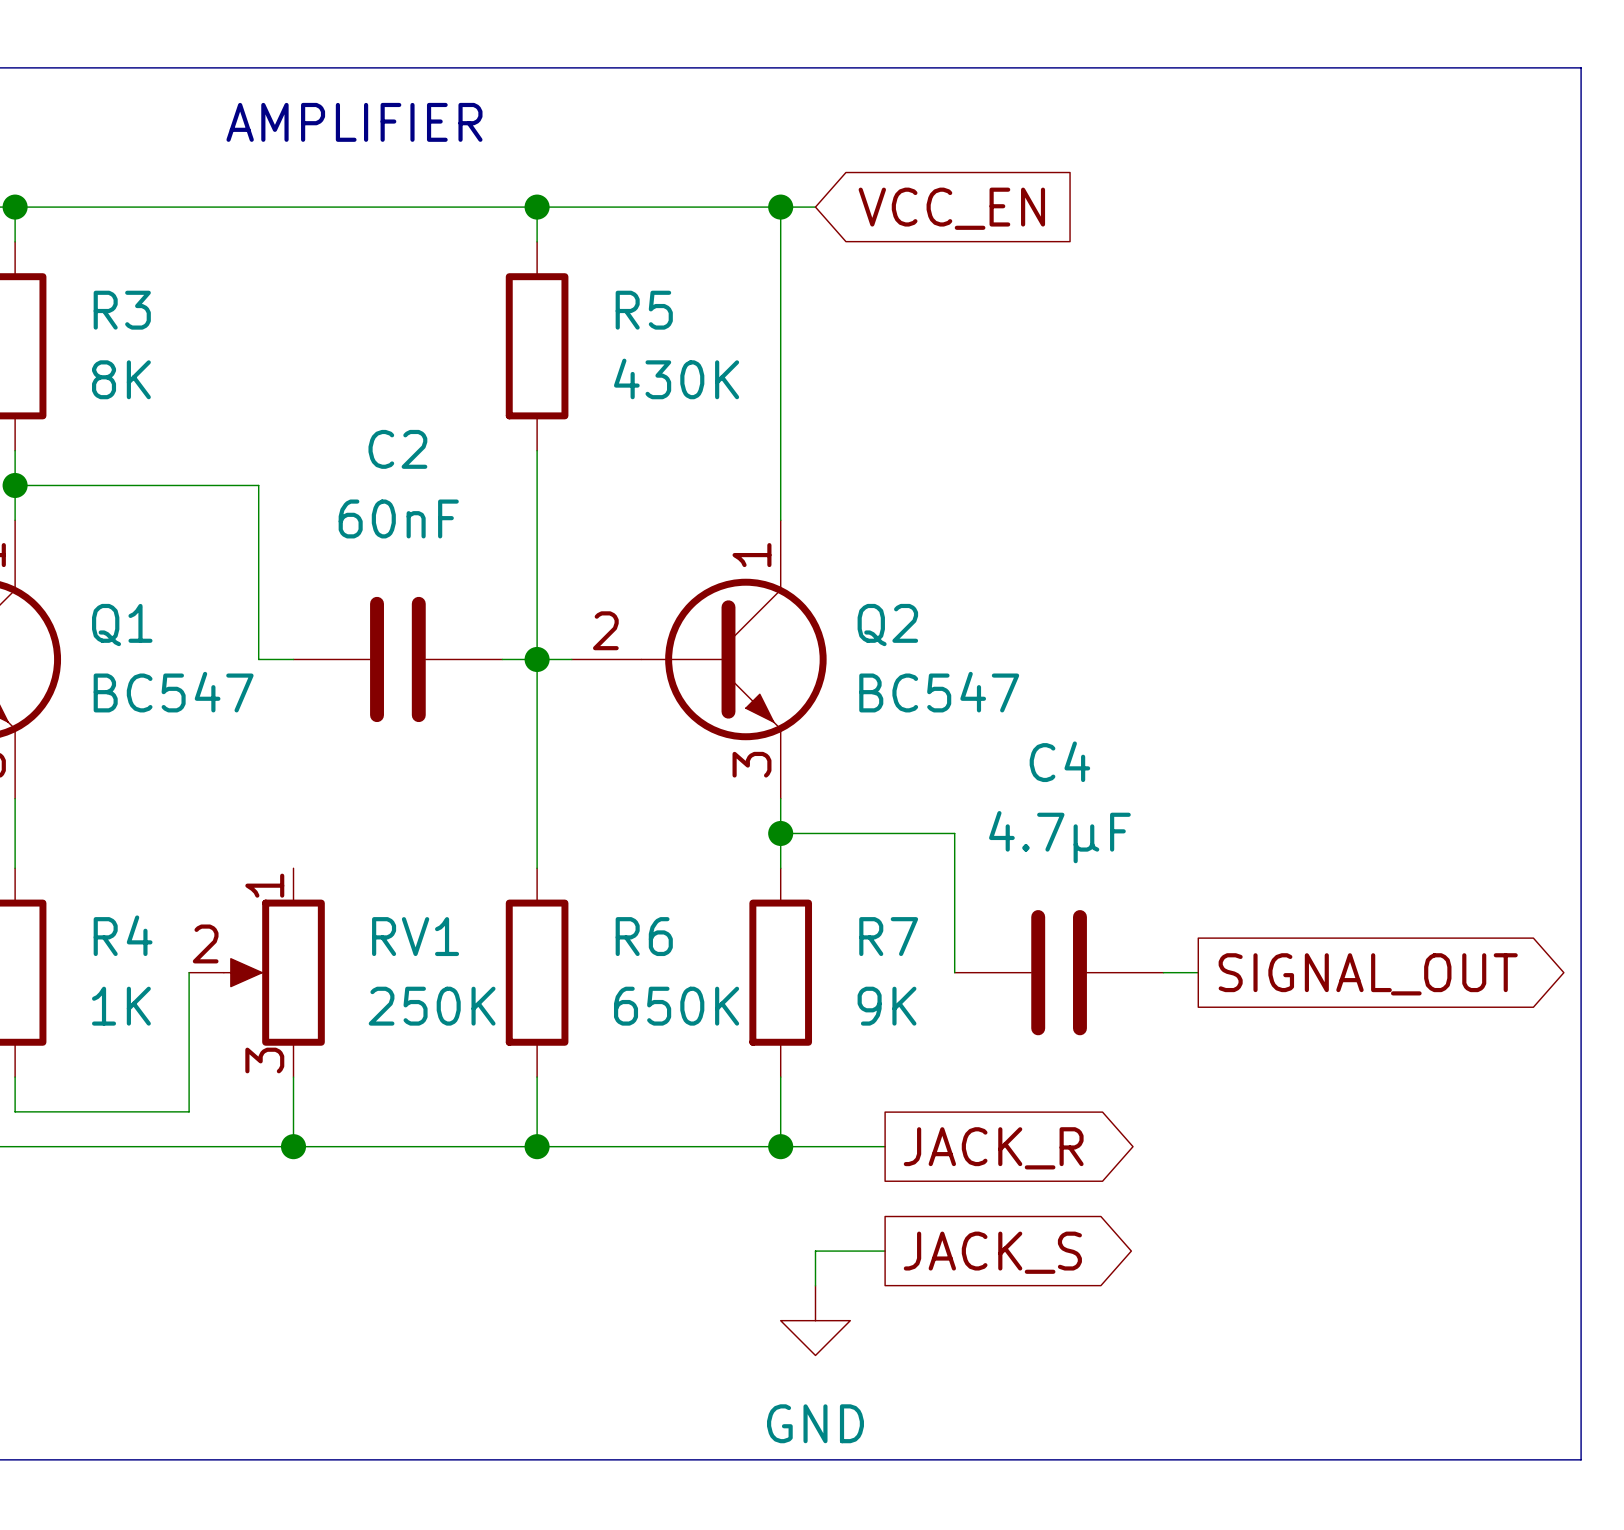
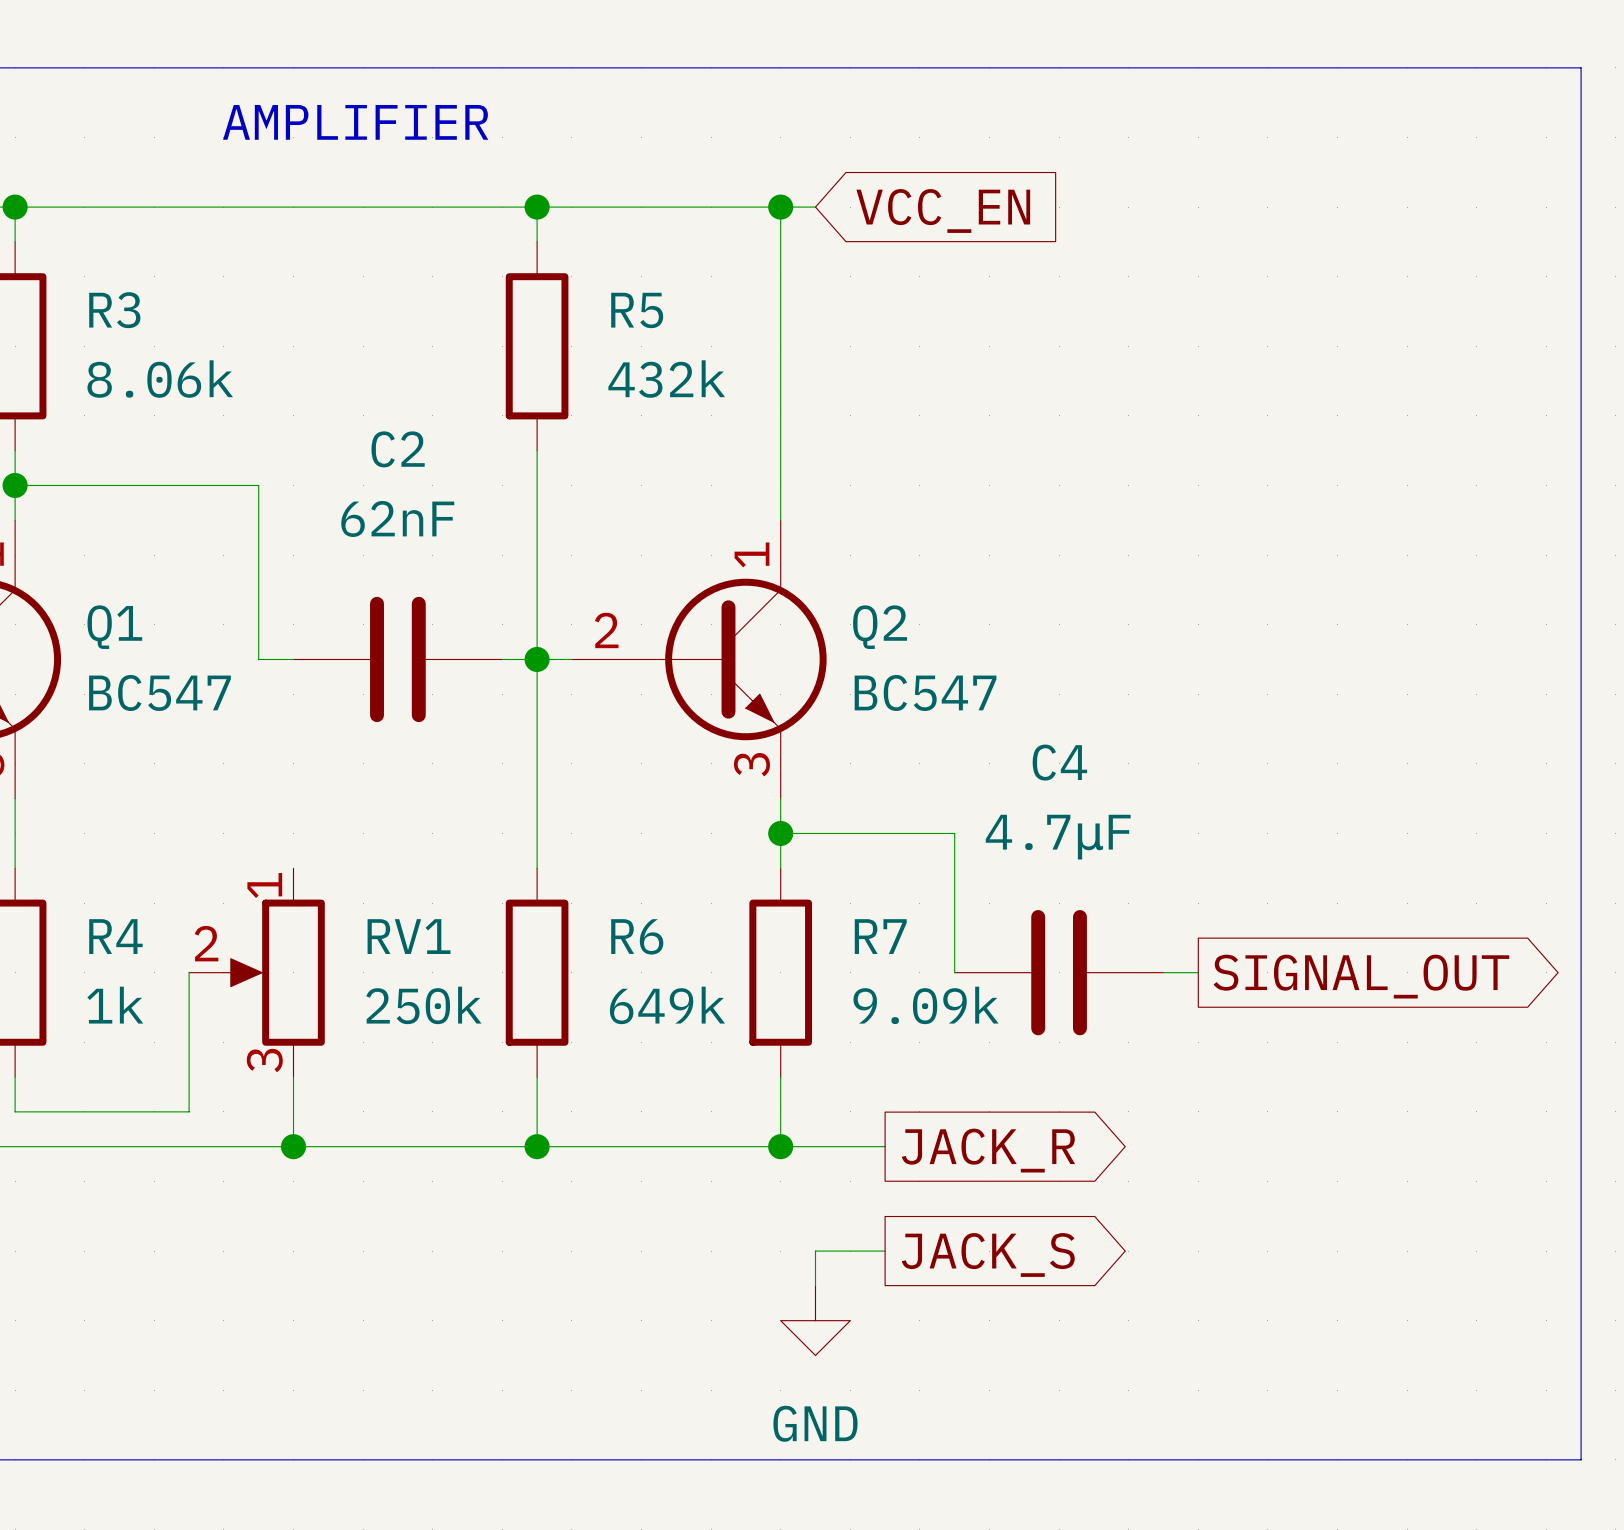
R5 value: 430K (676, 378) -> 432k (666, 379)
R3 value: 8K (121, 379) -> 8.06k (160, 379)
C2 value: 60nF (398, 518) -> 62nF (397, 518)
R4 value: 1K (121, 1006) -> 1k (115, 1005)
RV1 value: 250K (432, 1006) -> 250k (423, 1005)
R6 value: 650K (676, 1006) -> 649k (667, 1005)
R7 value: 9K (887, 1006) -> 9.09k (926, 1005)

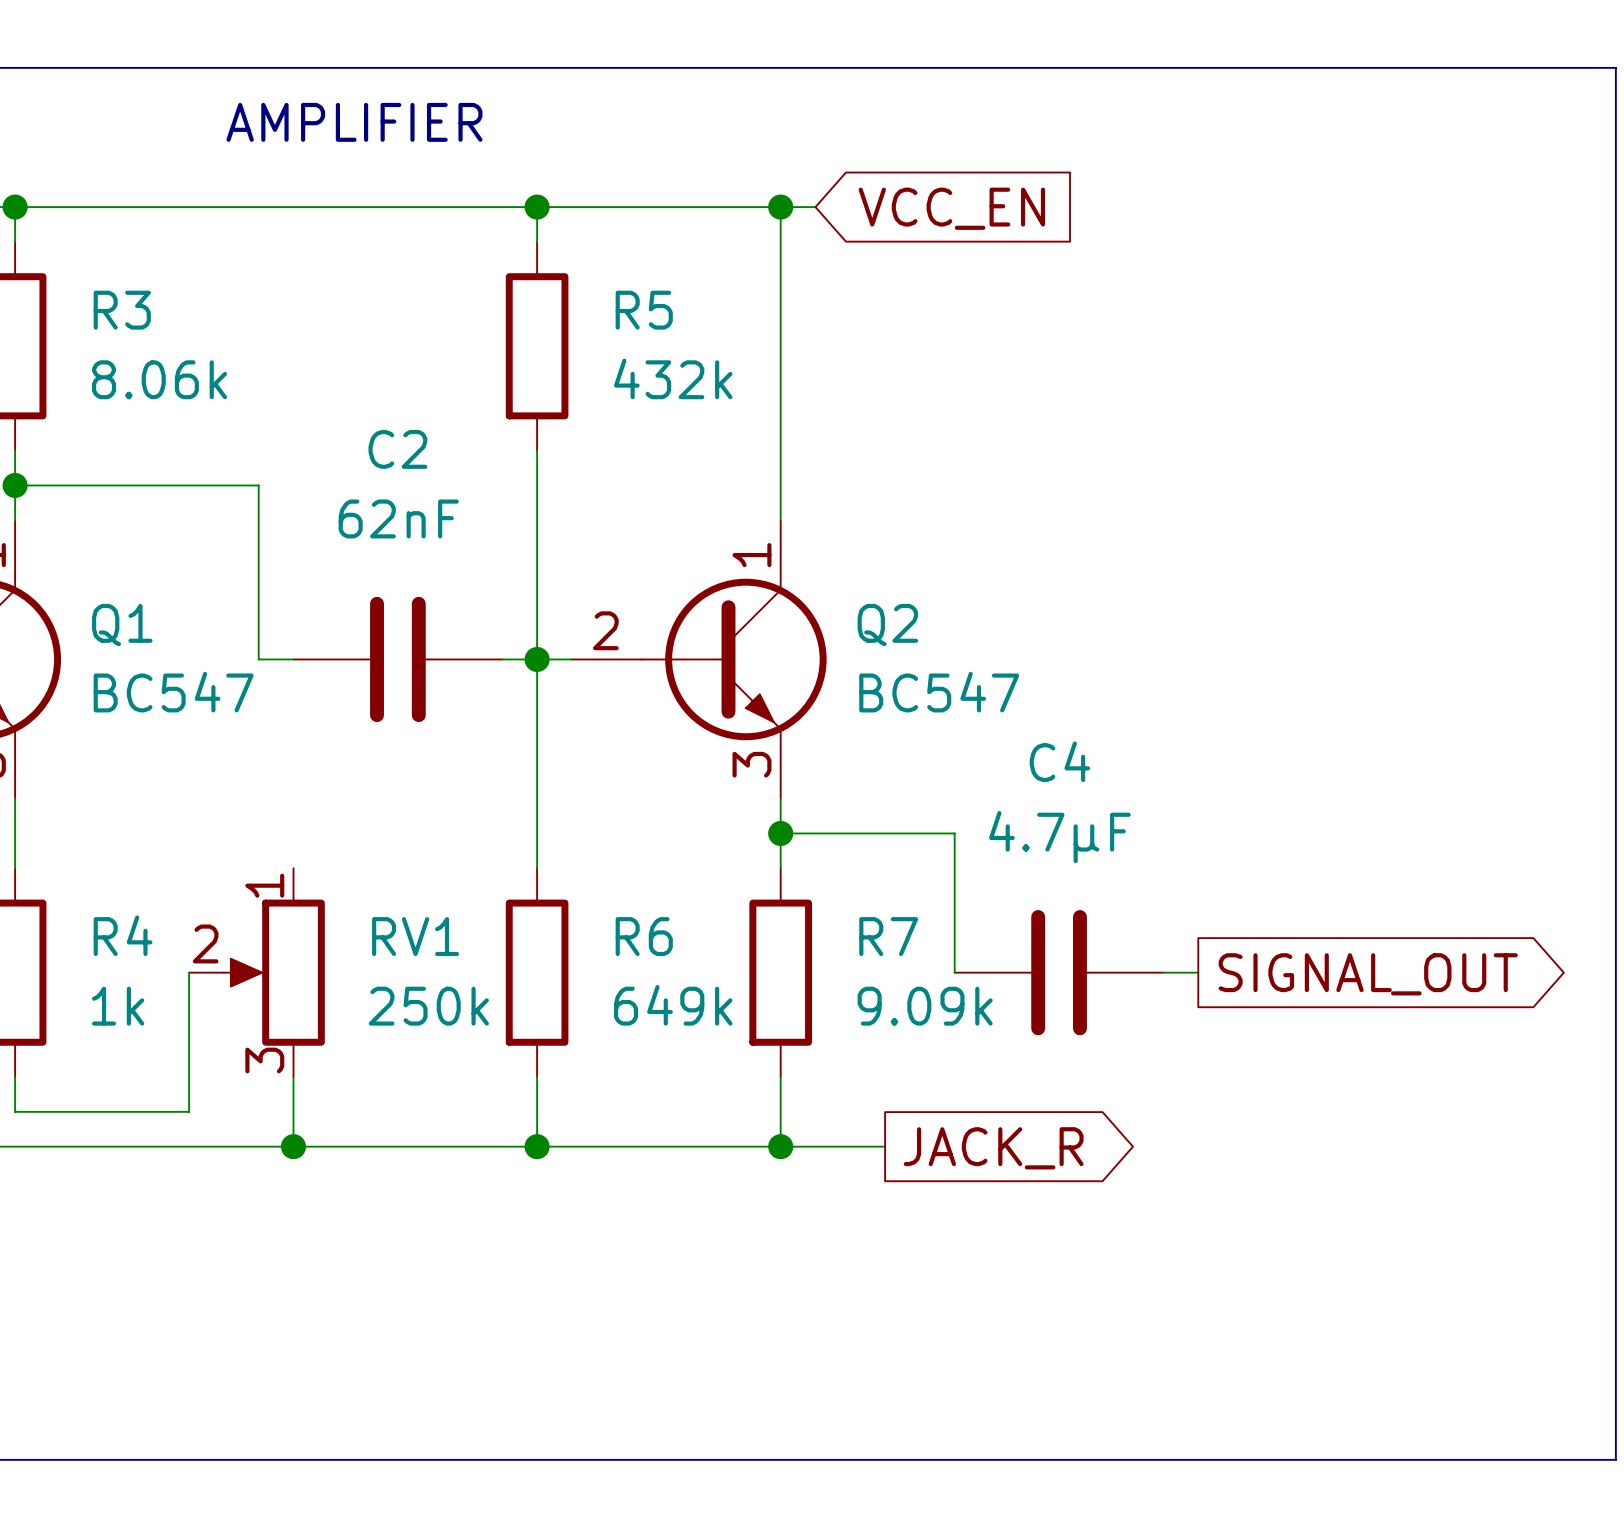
line: (1581, 67) (1581, 1459) -> (1581, 67) (1615, 67) (1615, 1459) (1581, 1459)
wire: (885, 1251) (815, 1251) (815, 1285) -> none
global label: JACK_S (988, 1254) -> none
power symbol: GND (815, 1320) -> none

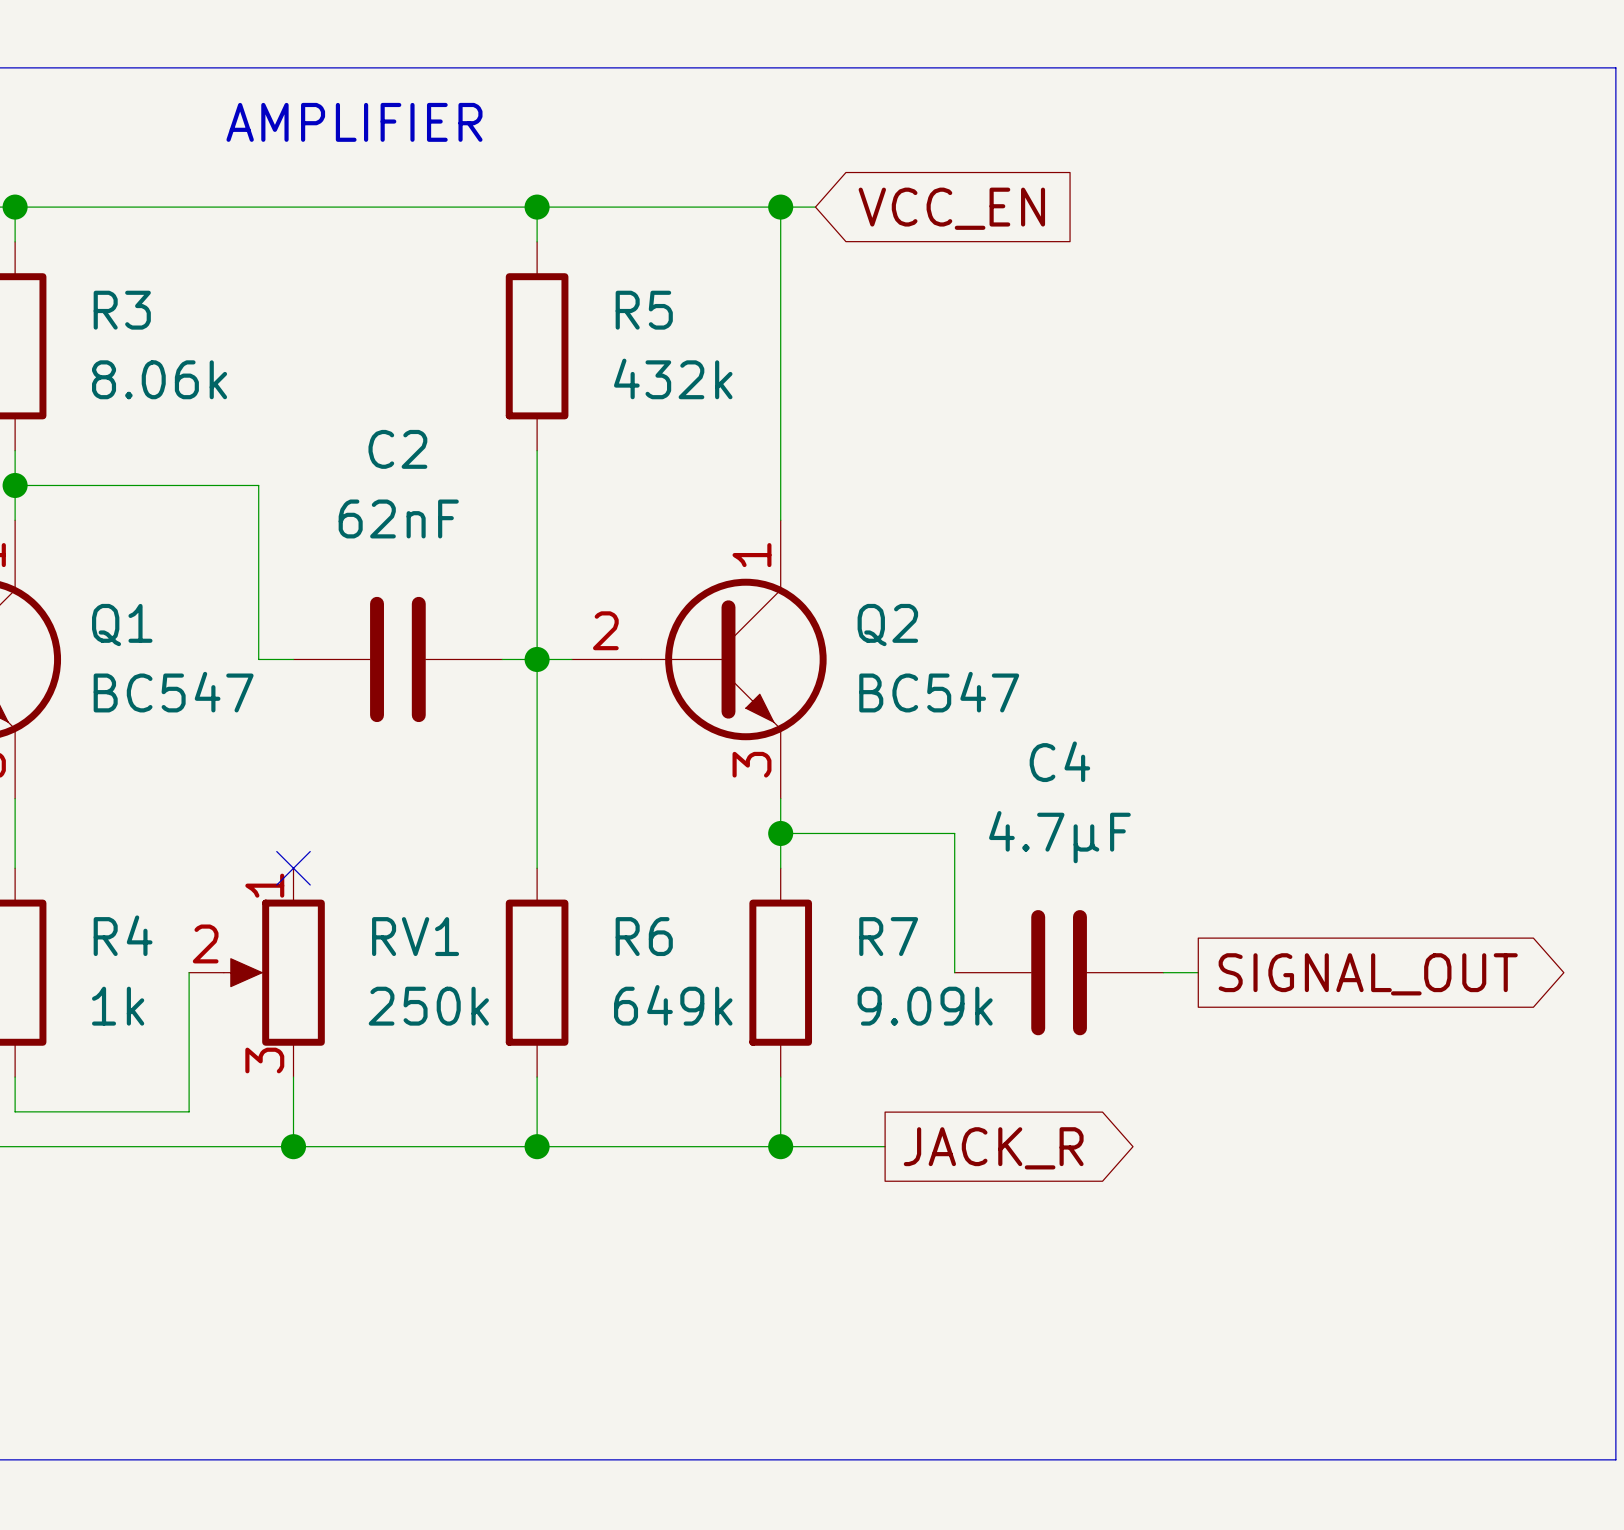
no-connect mark: none -> (293, 868)

